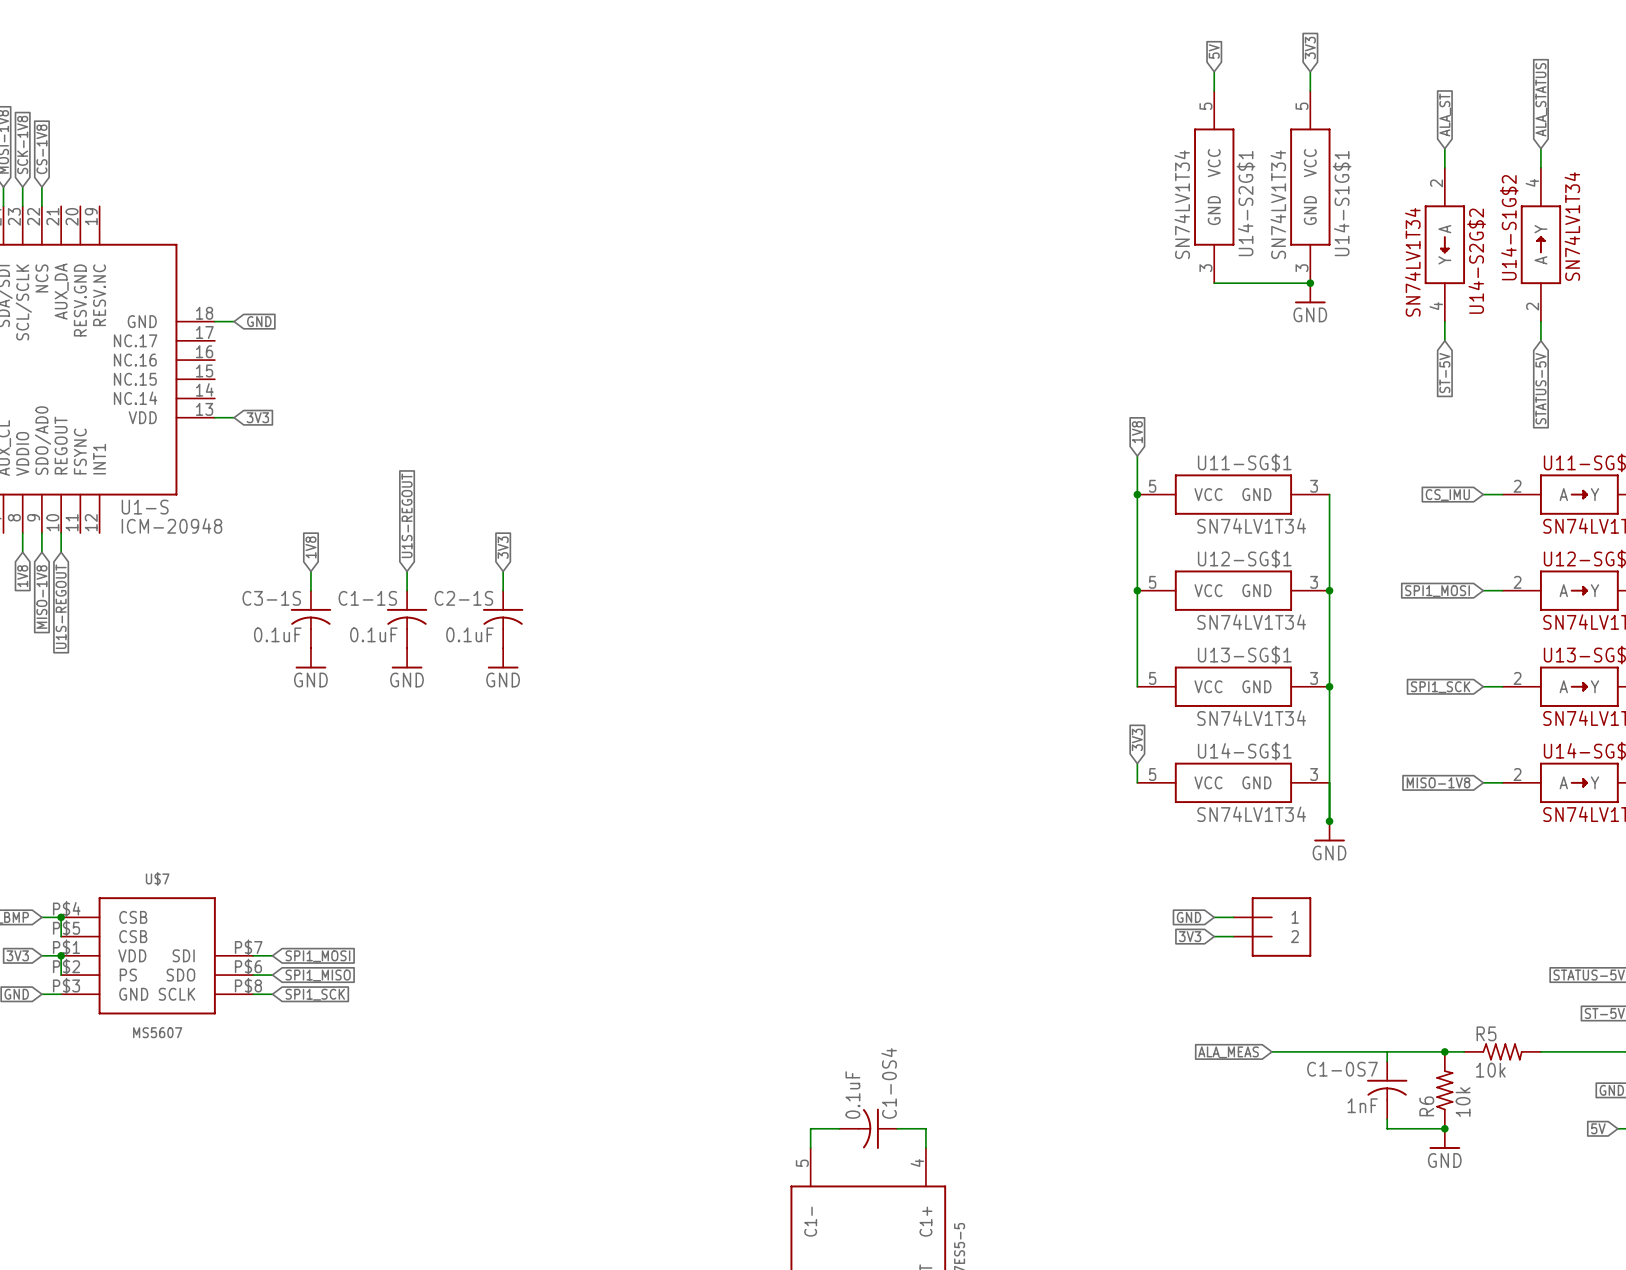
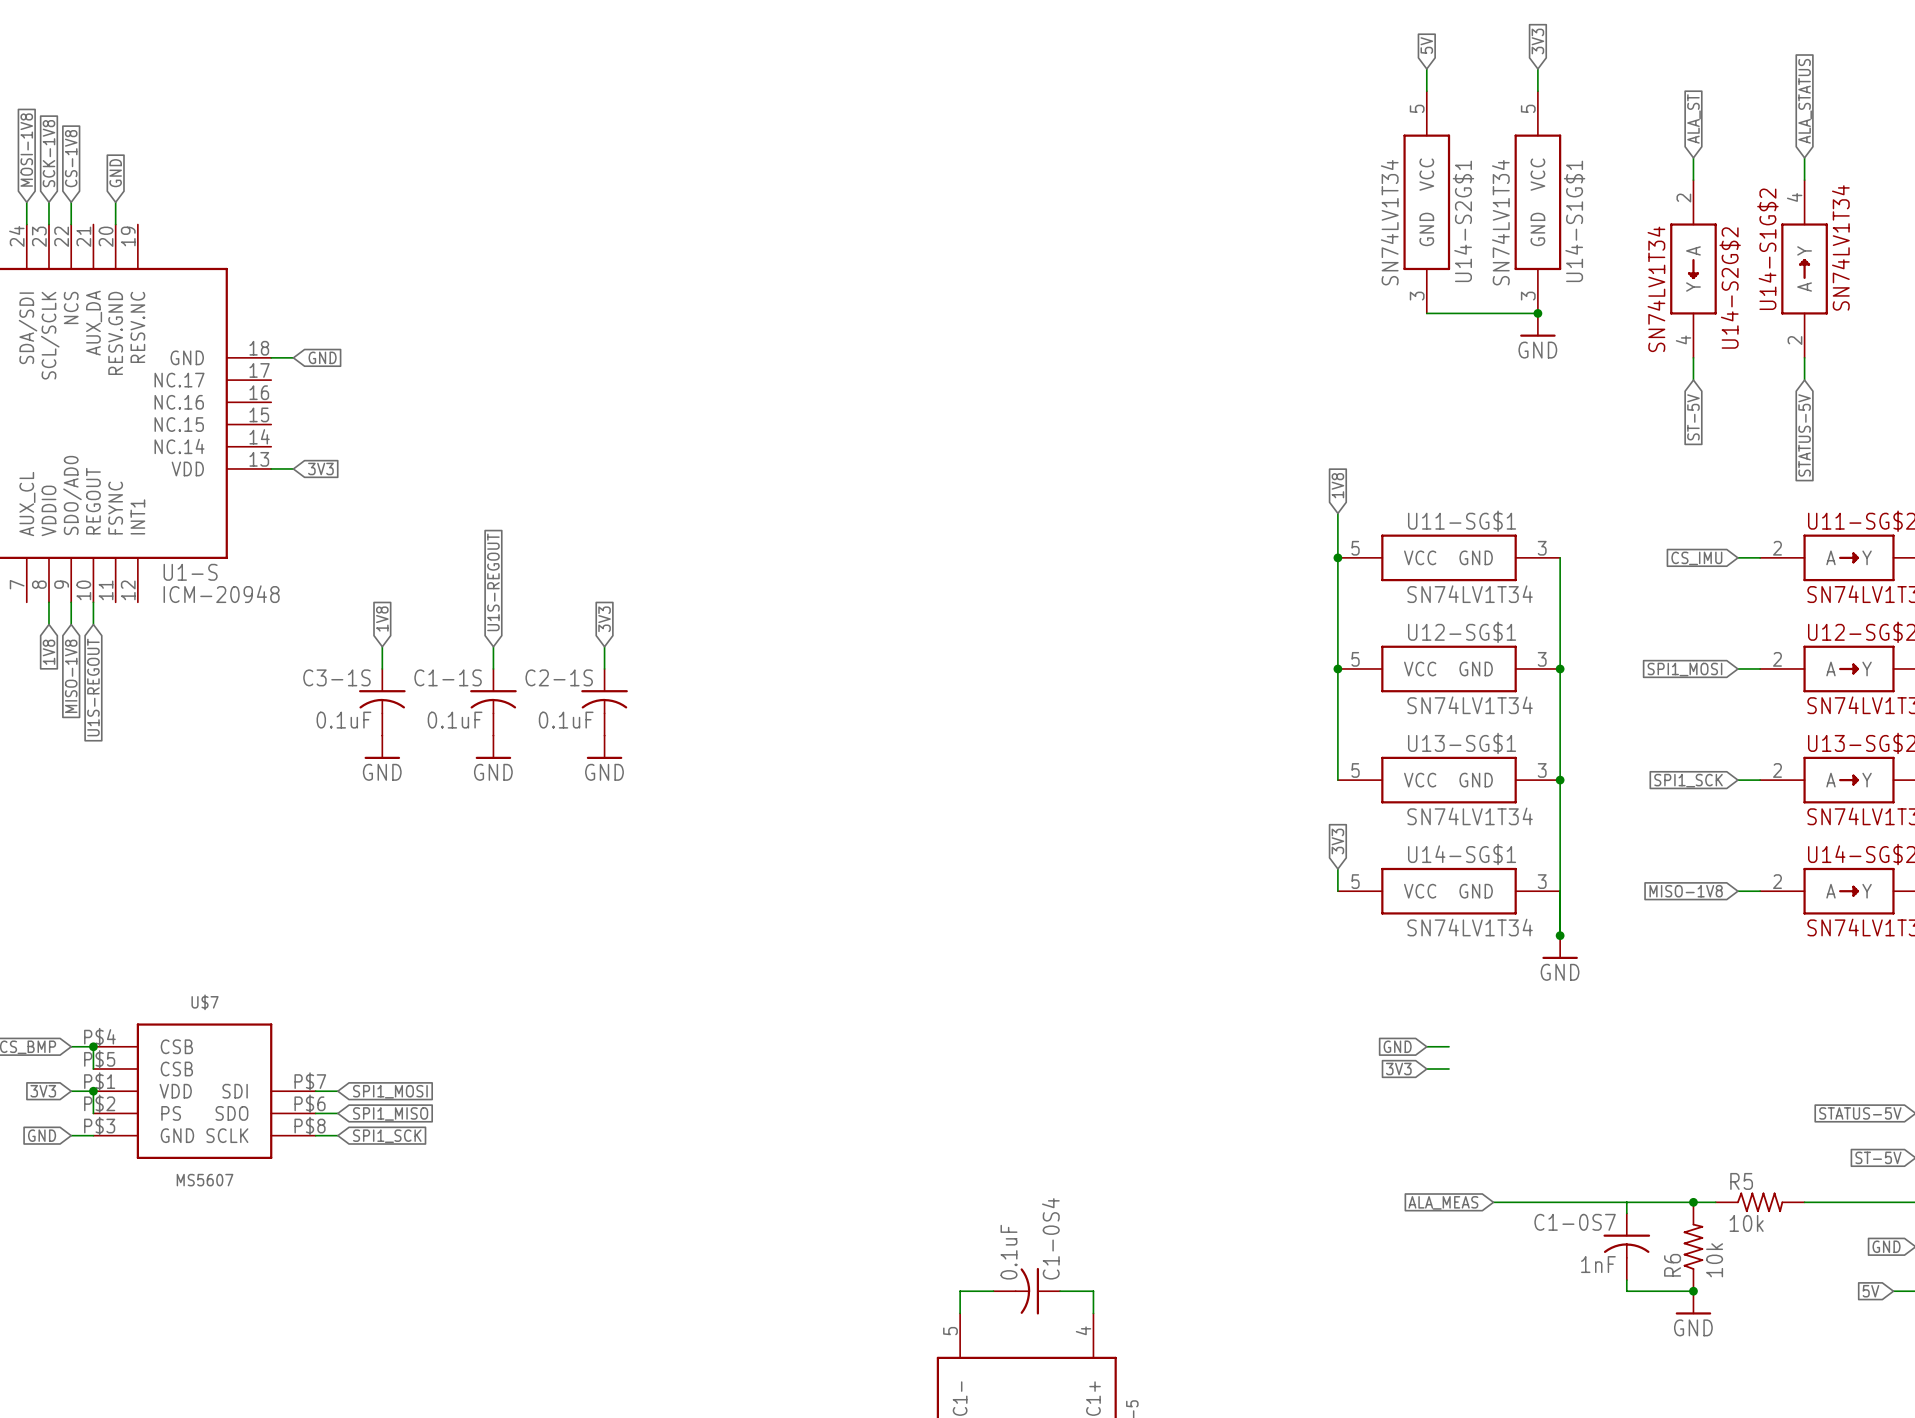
global label: none -> GND (115, 173)
wire: none -> (115, 202) (115, 224)
part: (1272, 926) -> none

